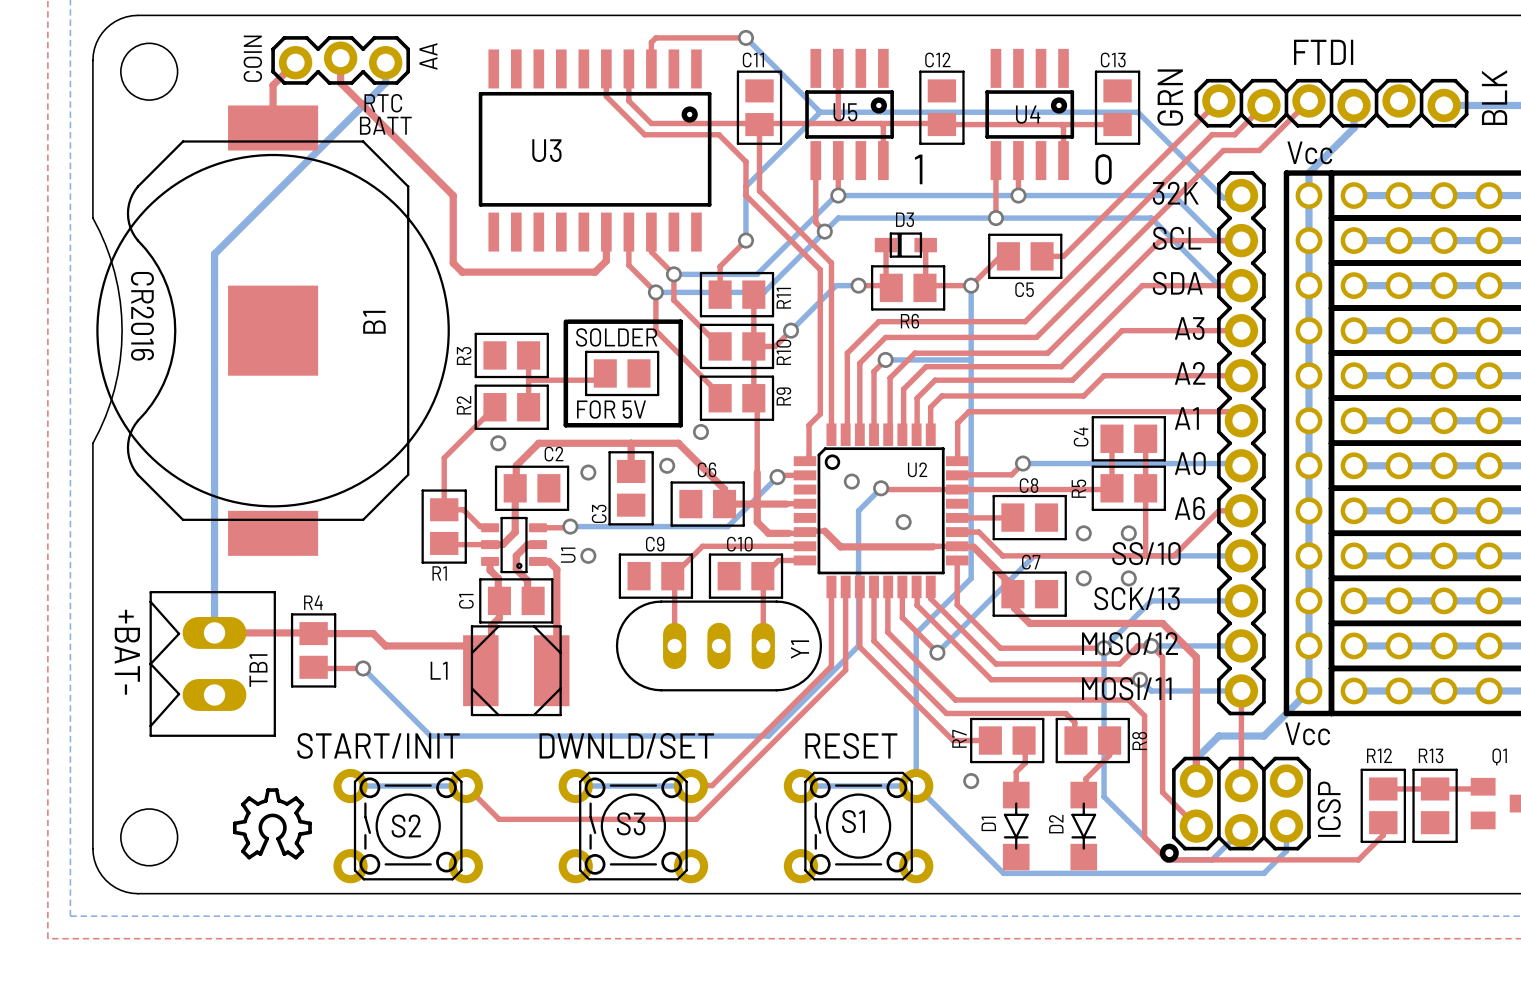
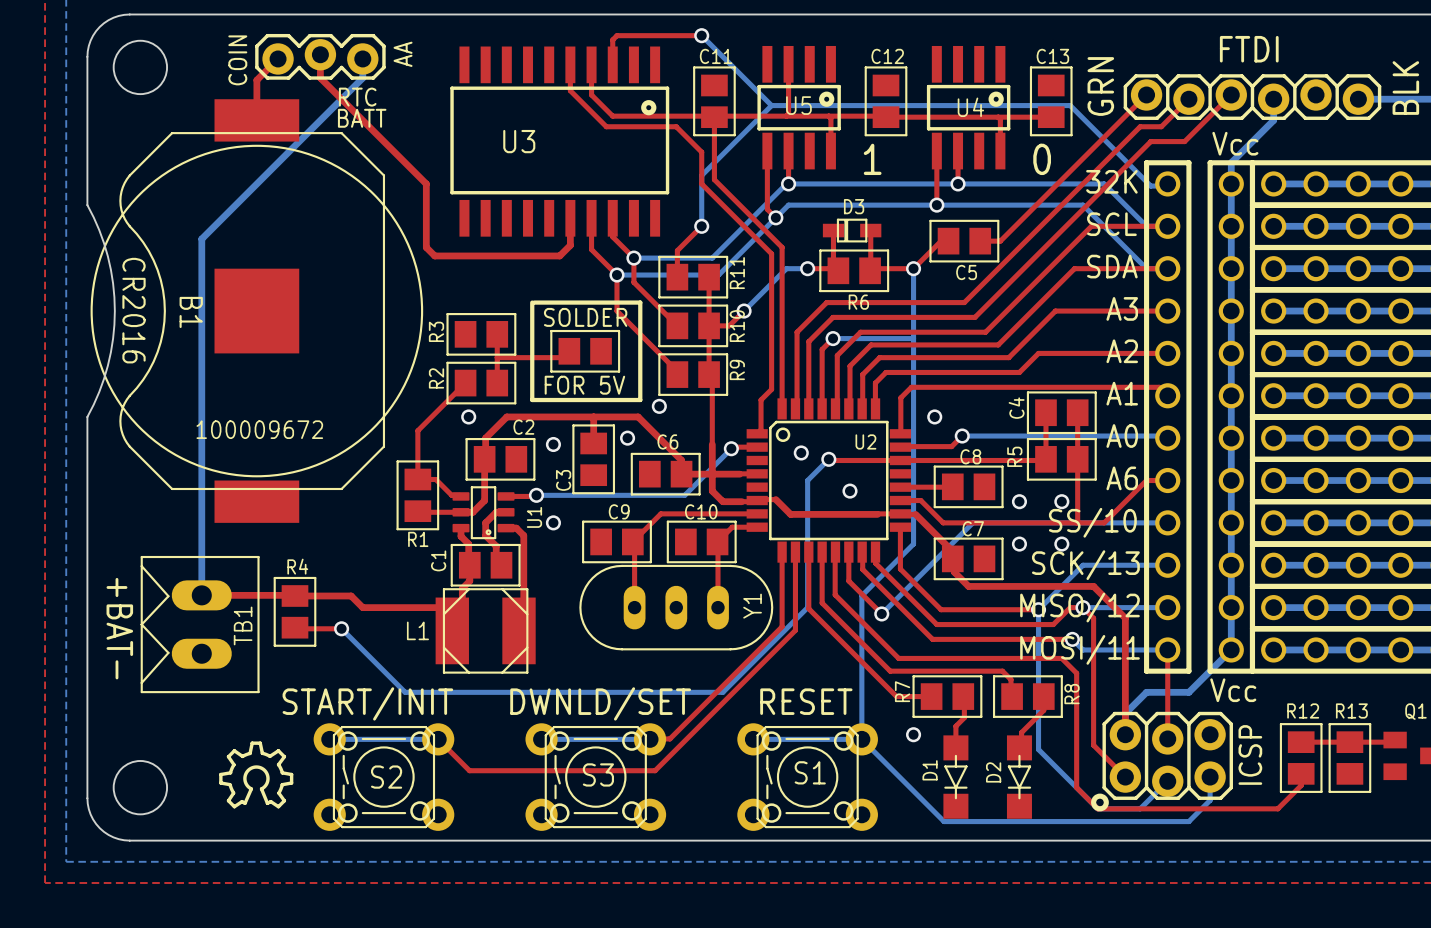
part footprint: [1217, 171, 1266, 716] -> [1144, 160, 1192, 674]
B1 name rotation: 0° (374, 322) -> 180° (191, 312)
B1 name position: B1 (374, 322) -> B1 (191, 312)
via: none -> (934, 416)
text: none -> 100009672 (259, 429)

